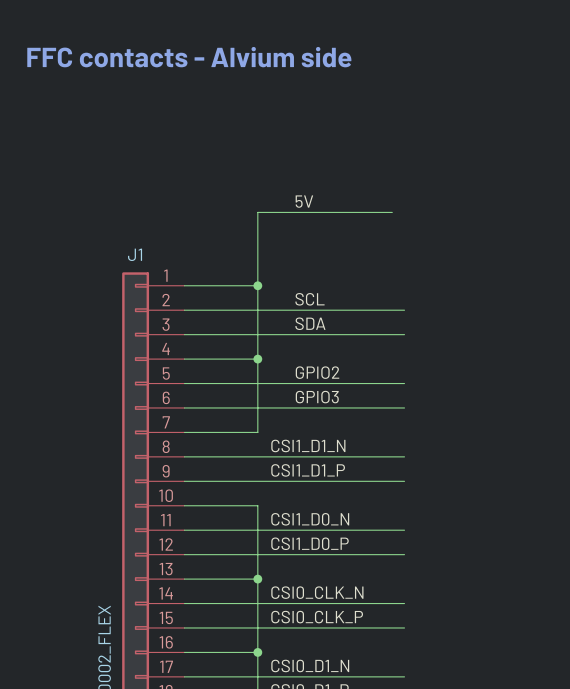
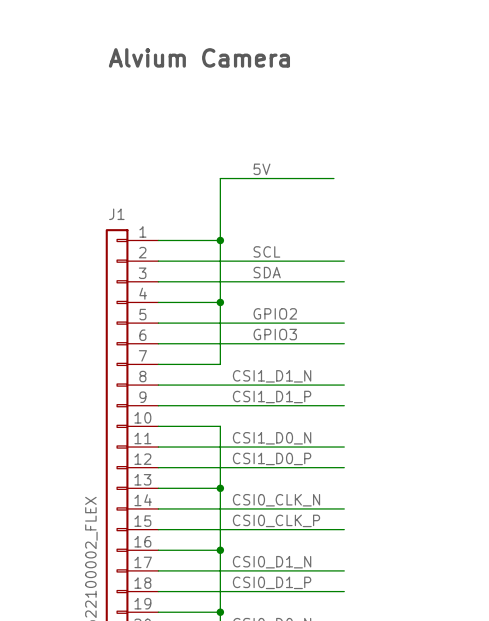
text: FFC contacts - Alvium side (189, 57) -> none
text: none -> Alvium Camera (199, 57)

